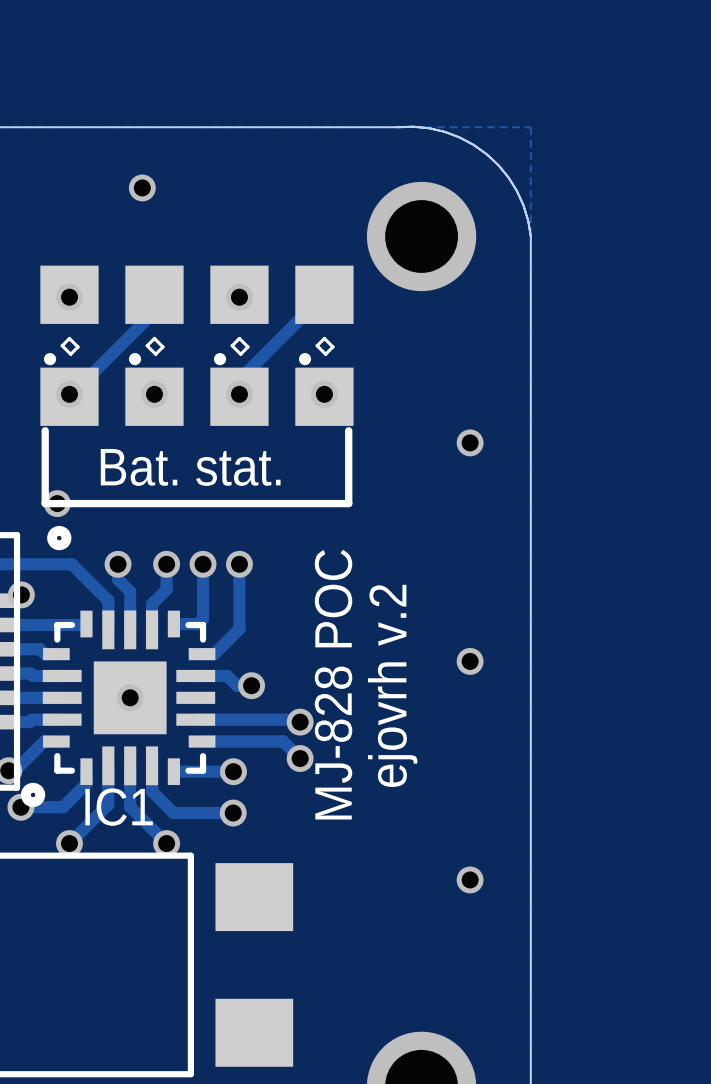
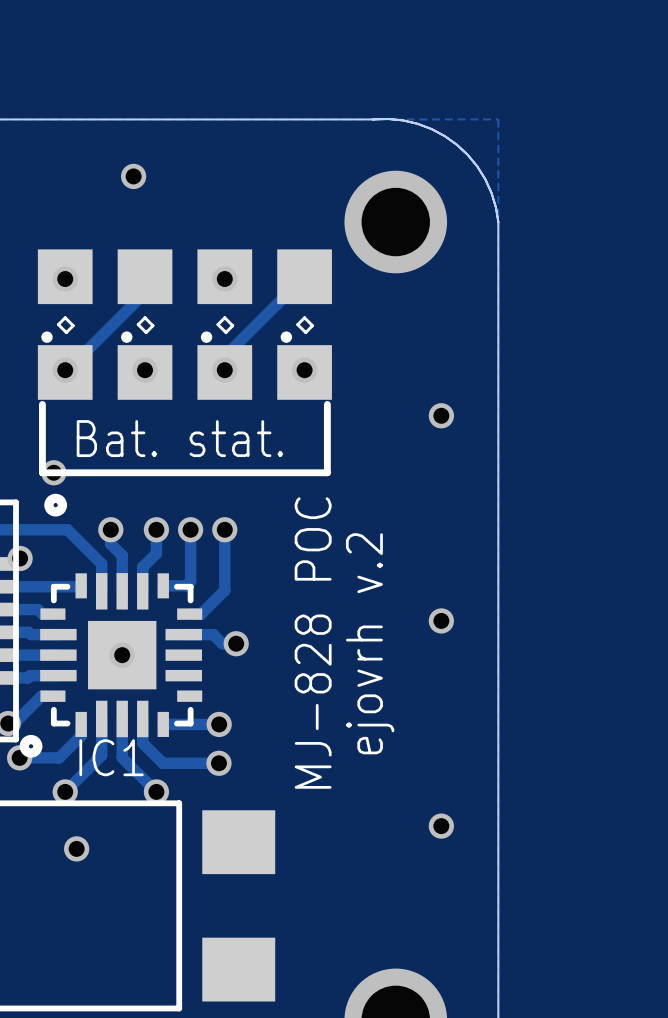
track: (195, 719) (297, 719) (300, 722) -> none
via: (300, 722) -> none
track: (202, 741) (283, 741) (300, 758) -> none
via: (300, 758) -> none
via: none -> (76, 848)

